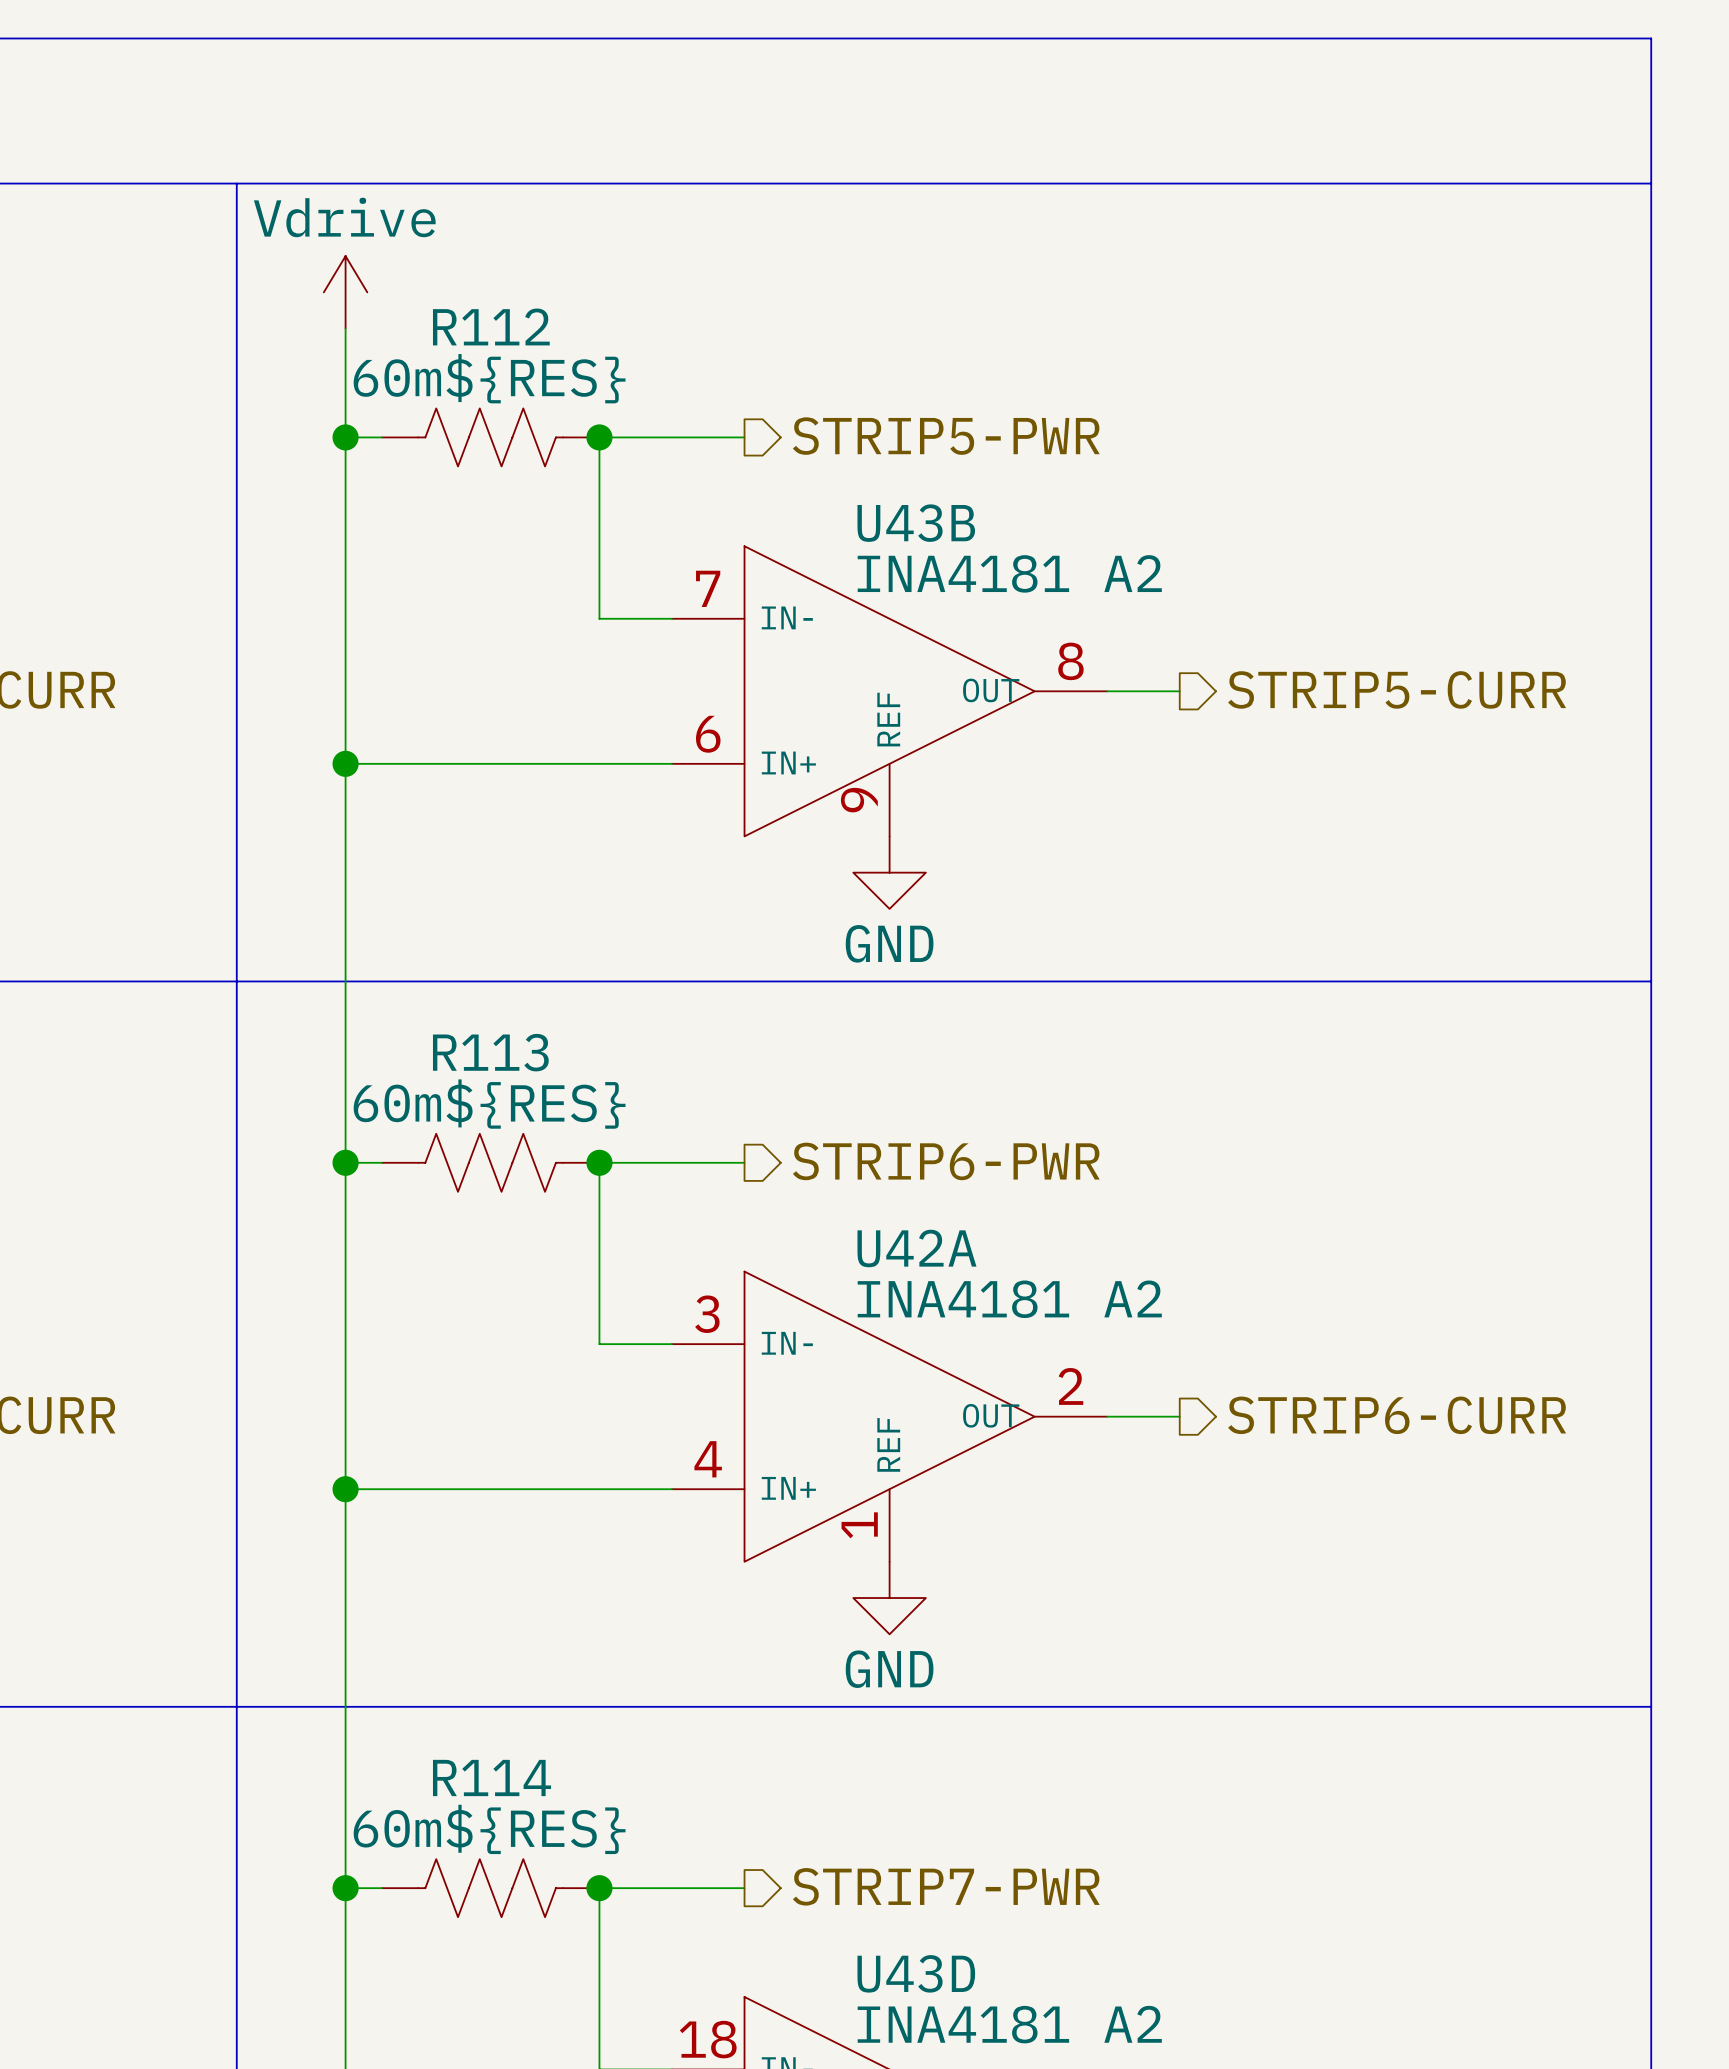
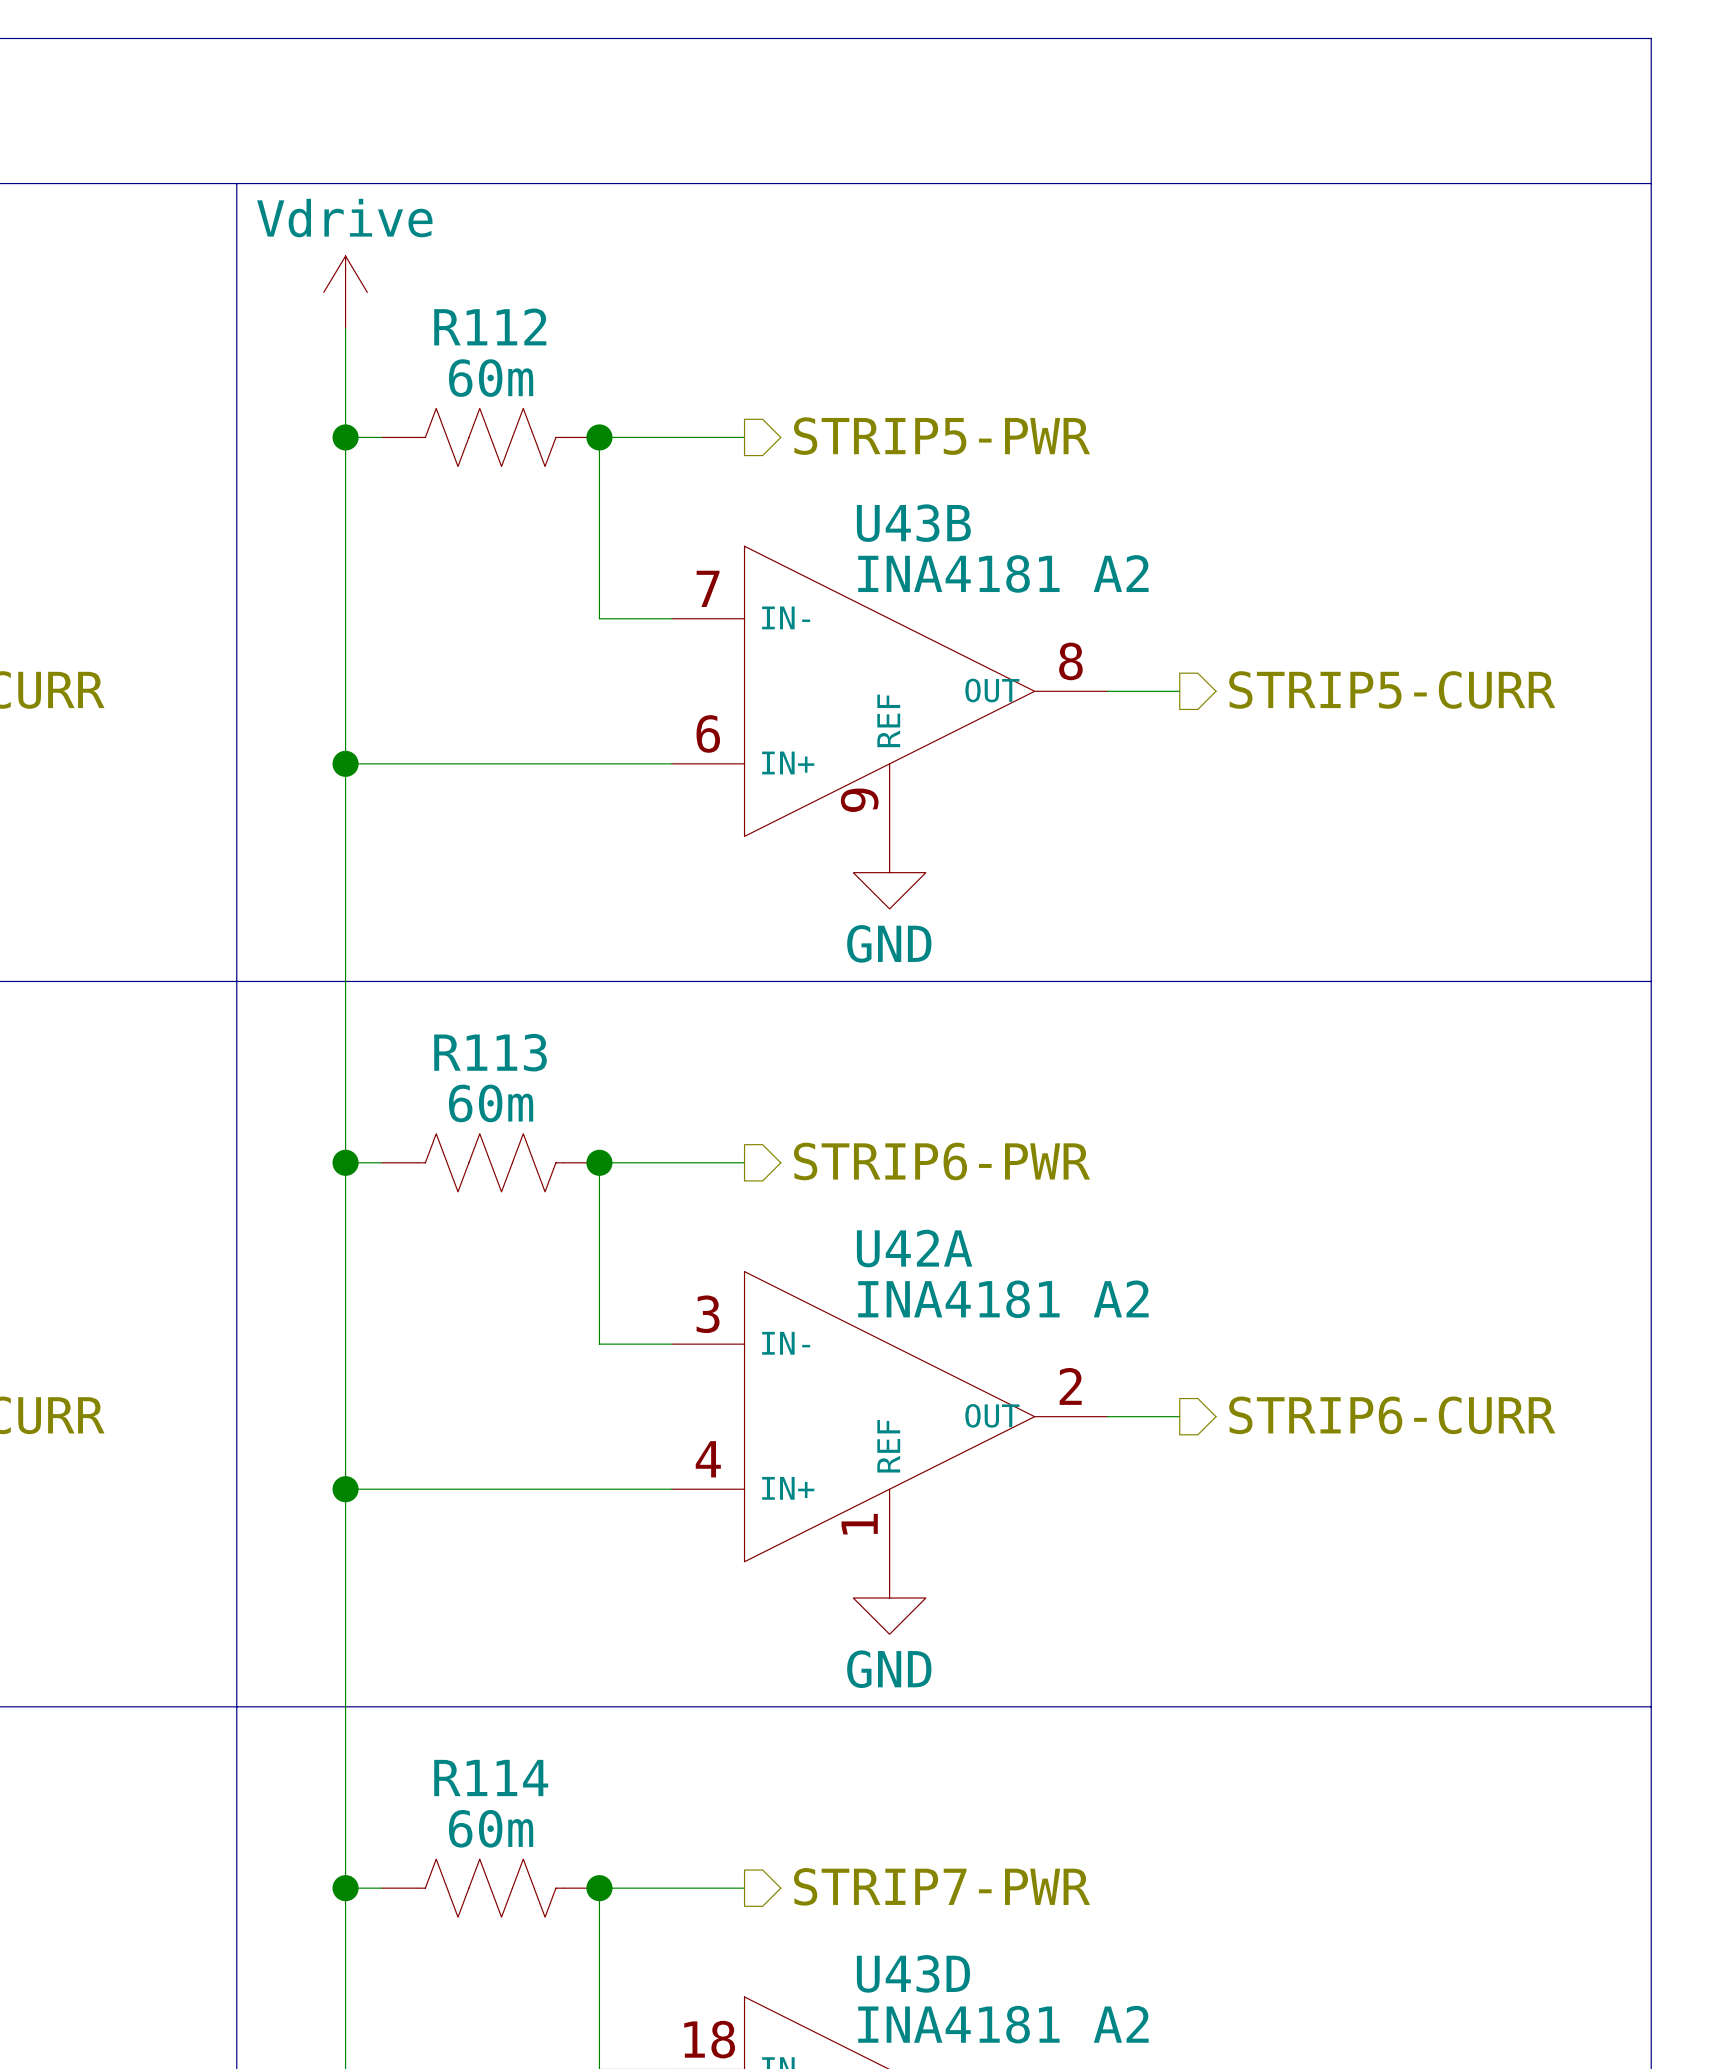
R112 value: 60m${RES} (489, 378) -> 60m (491, 378)
R113 value: 60m${RES} (489, 1104) -> 60m (491, 1103)
R114 value: 60m${RES} (489, 1829) -> 60m (491, 1828)

